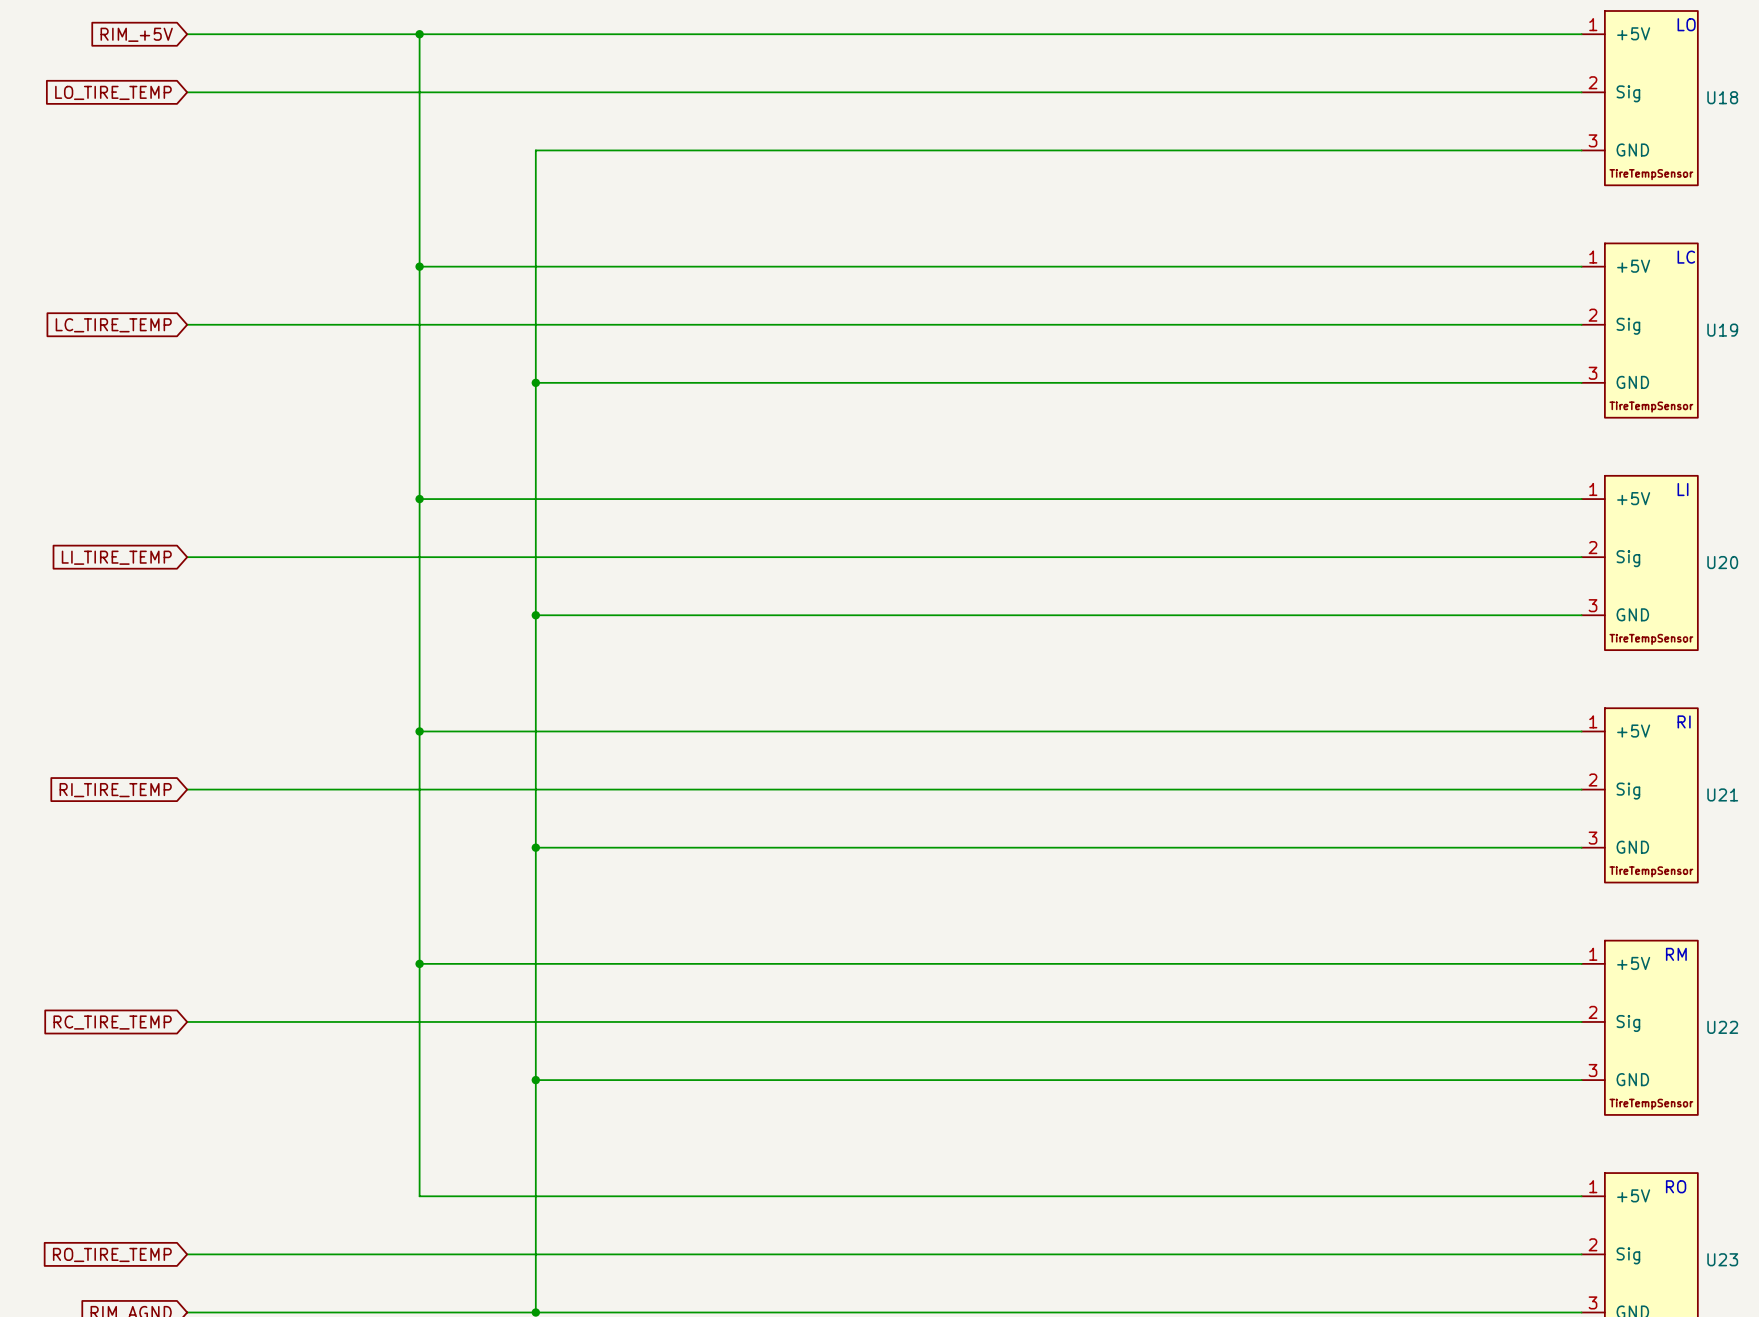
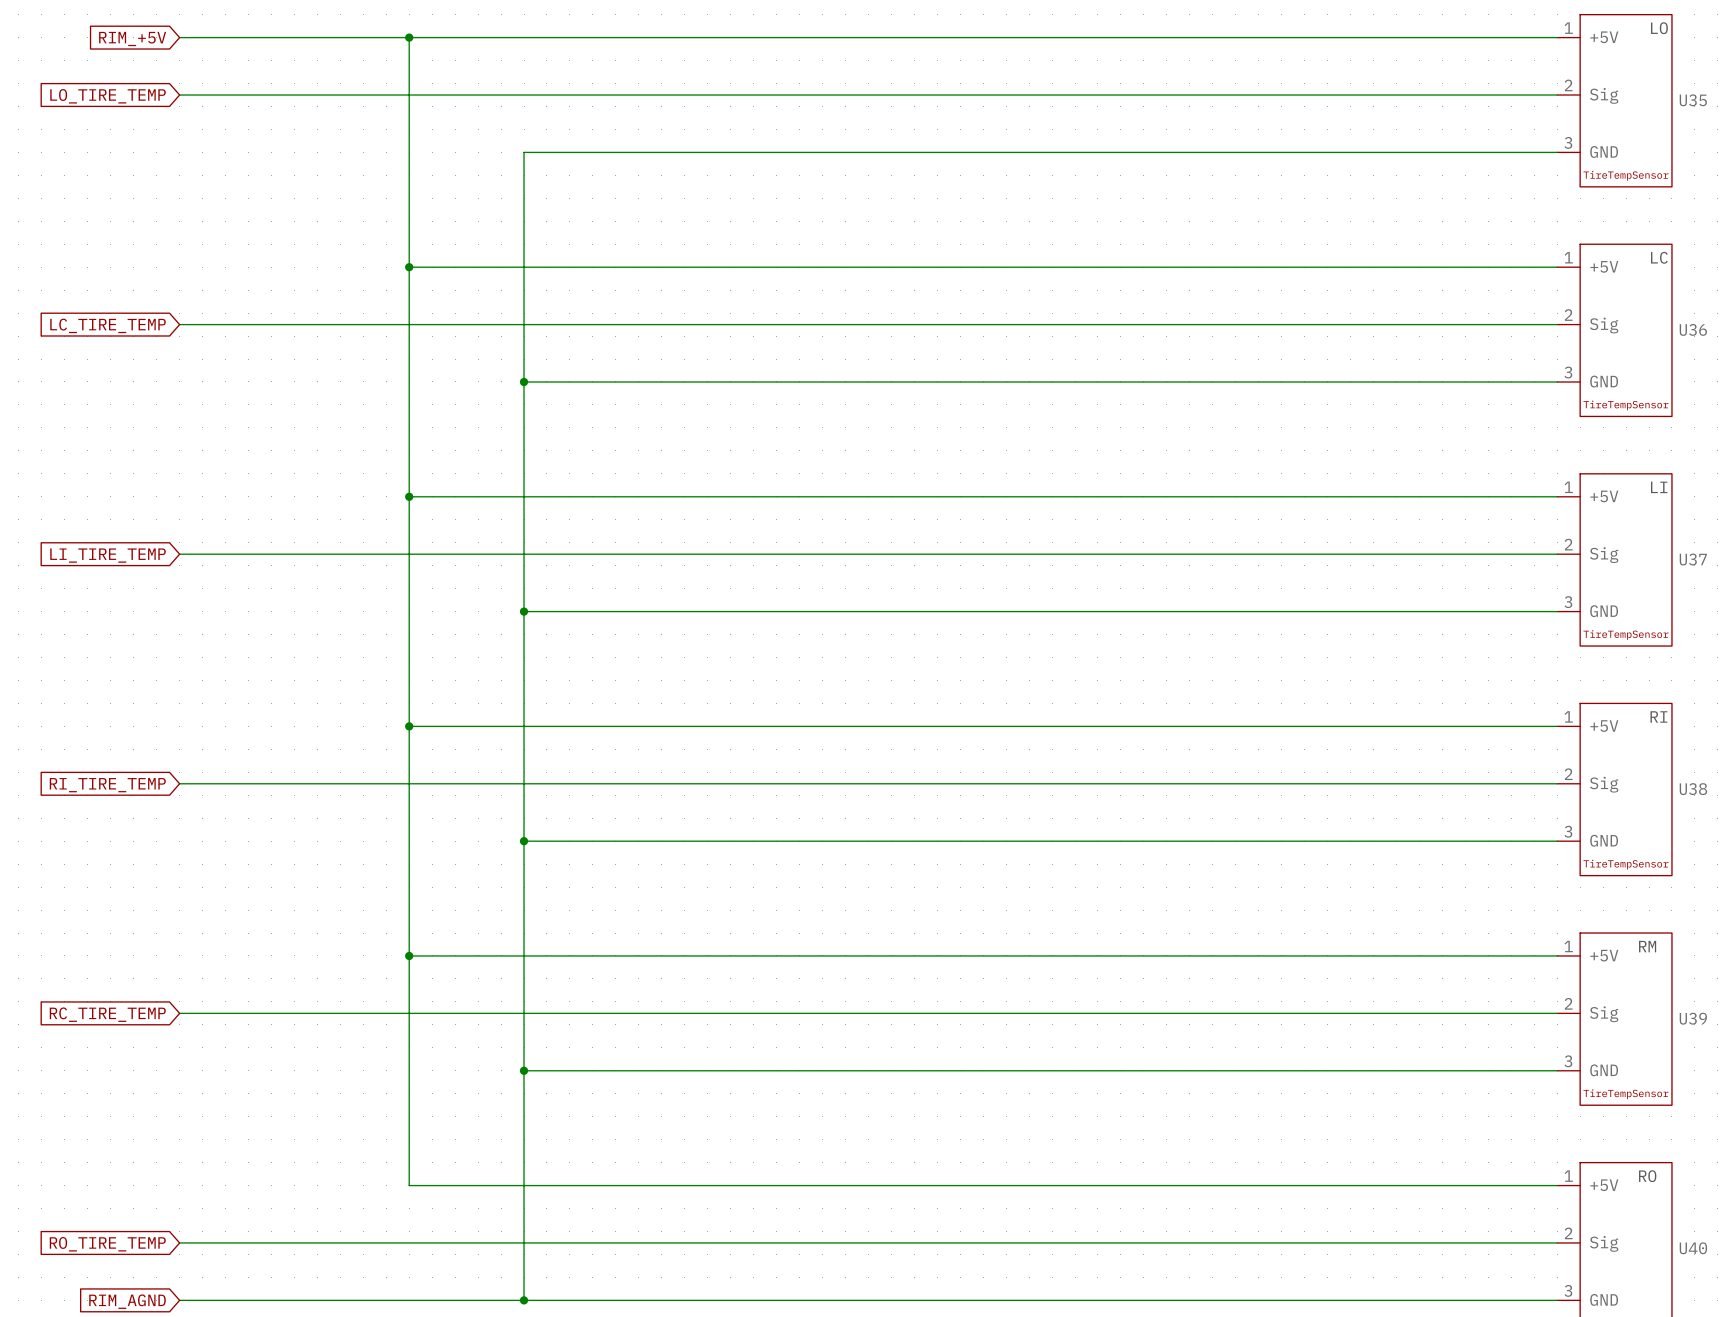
U18 name: U18 (1722, 97) -> U35 (1693, 100)
U19 name: U19 (1722, 330) -> U36 (1693, 329)
U20 name: U20 (1722, 562) -> U37 (1693, 559)
U21 name: U21 (1722, 794) -> U38 (1693, 789)
U22 name: U22 (1722, 1027) -> U39 (1693, 1018)
U23 name: U23 (1722, 1259) -> U40 (1693, 1248)

